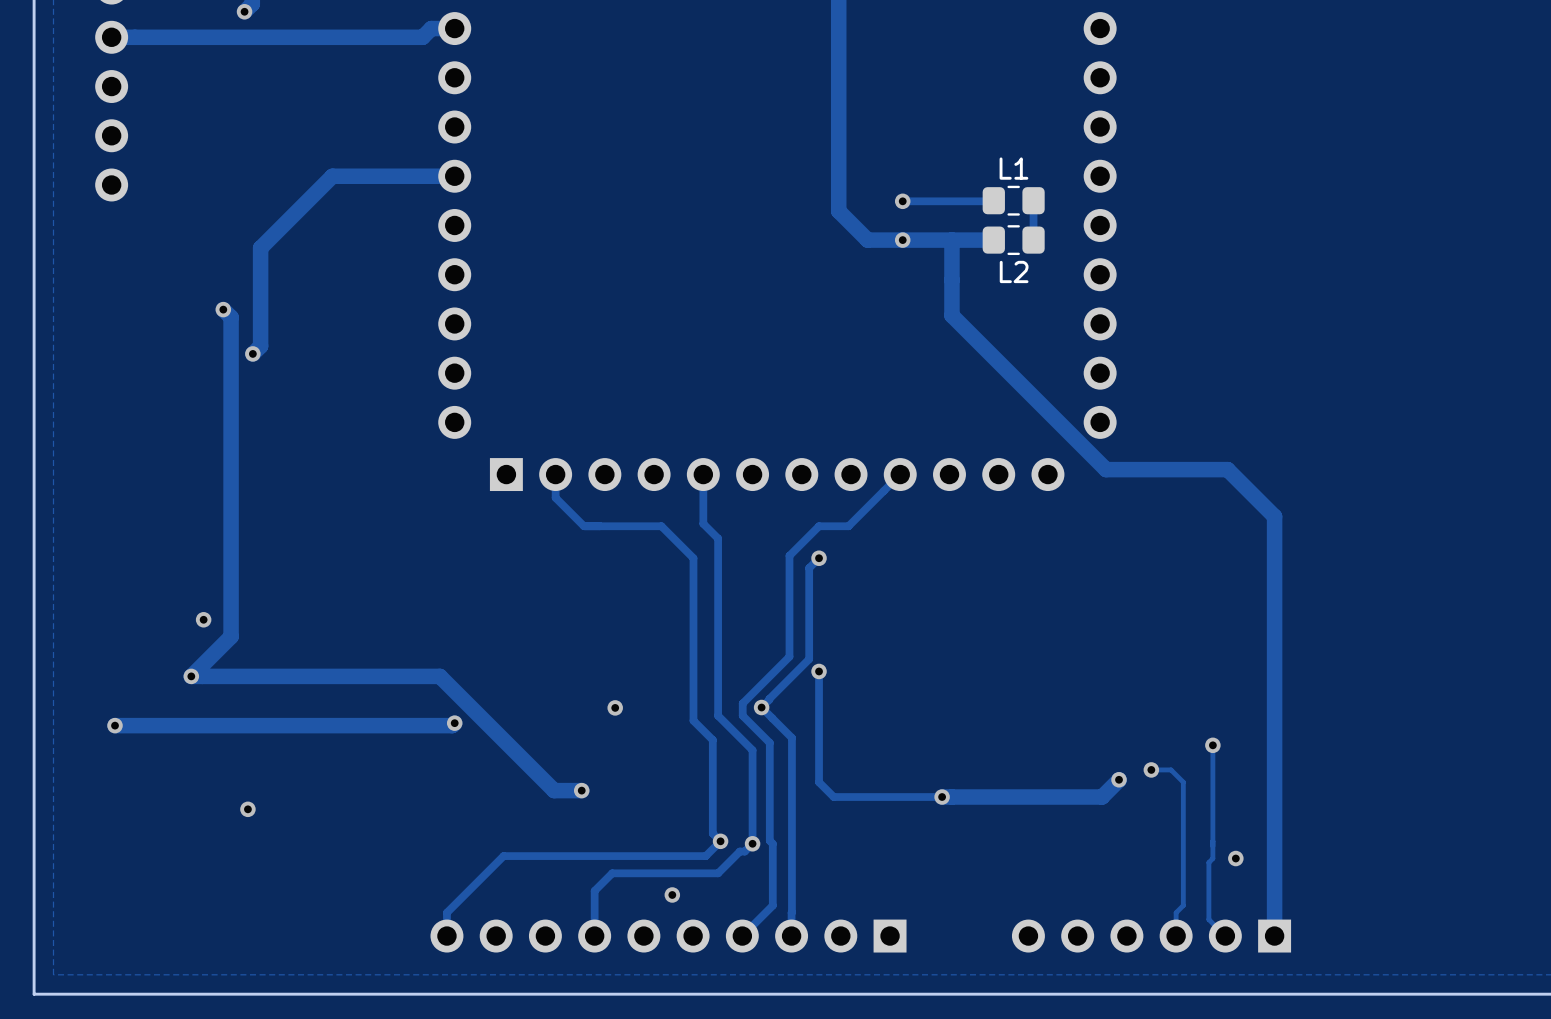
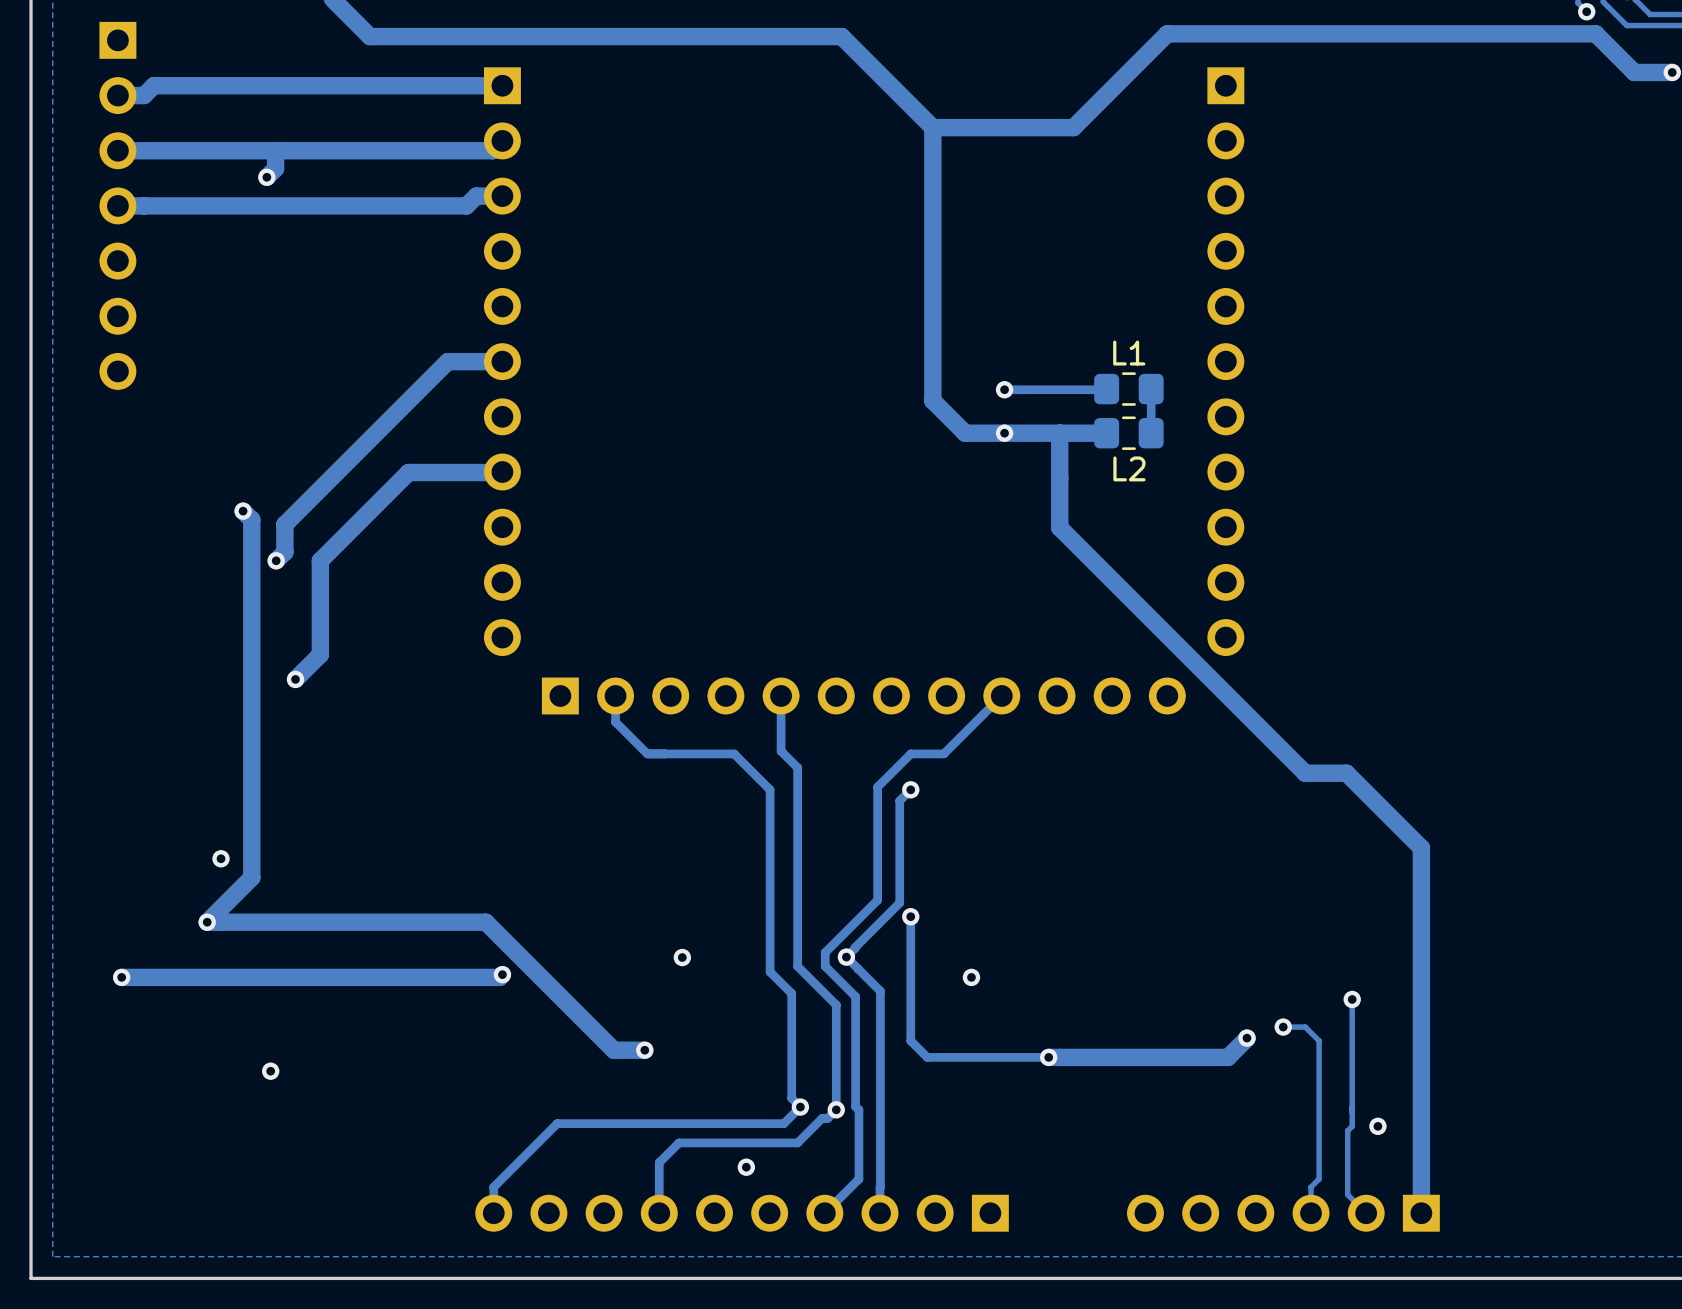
track: (405, 176) (332, 176) (260, 248) (260, 321) -> (447, 361) (284, 524)
track: none -> (502, 472) (408, 472) (320, 560) (320, 654) (295, 679)
track: (951, 315) (1106, 469) (1227, 469) (1274, 516) (1274, 610) -> (1059, 517) (1059, 527) (1305, 773) (1346, 773) (1421, 847)
via: none -> (295, 679)
via: none -> (971, 977)

